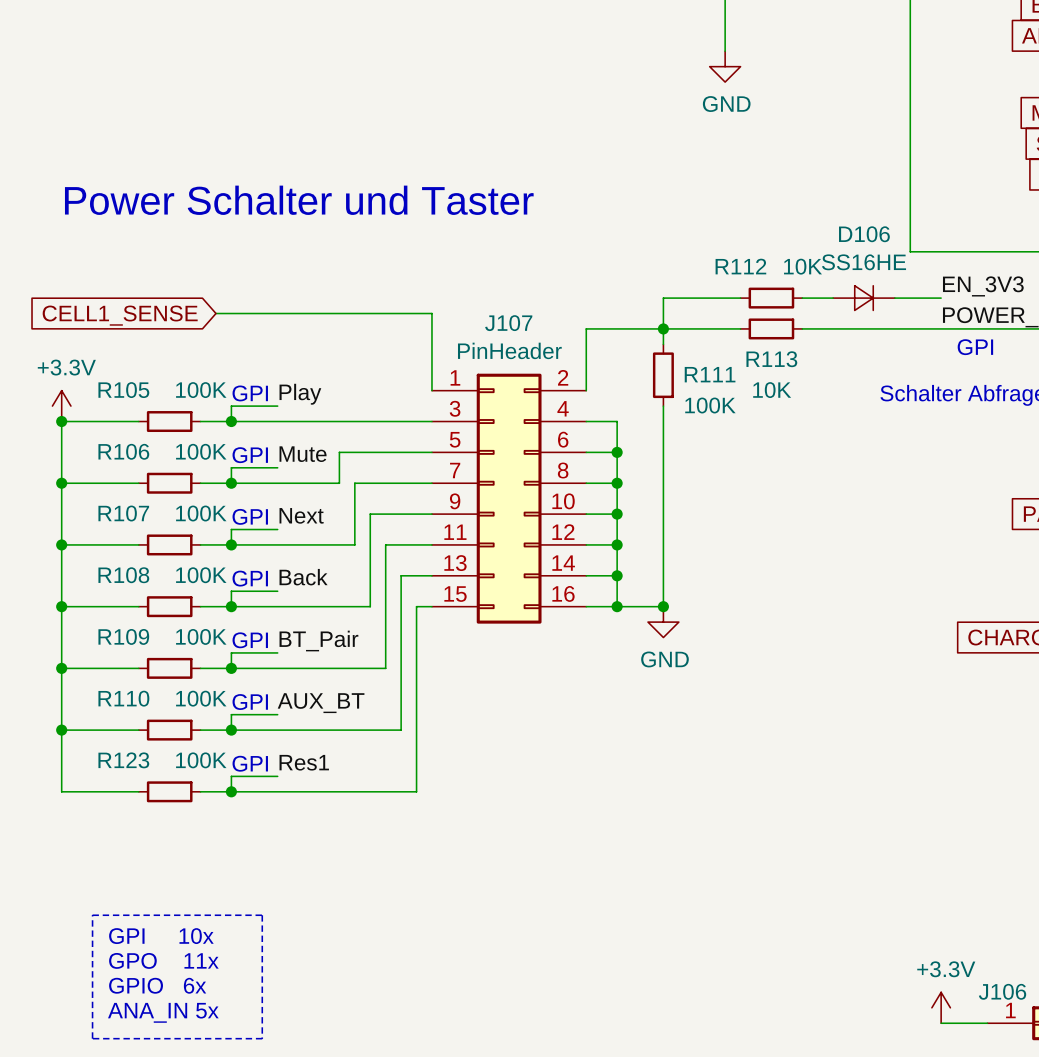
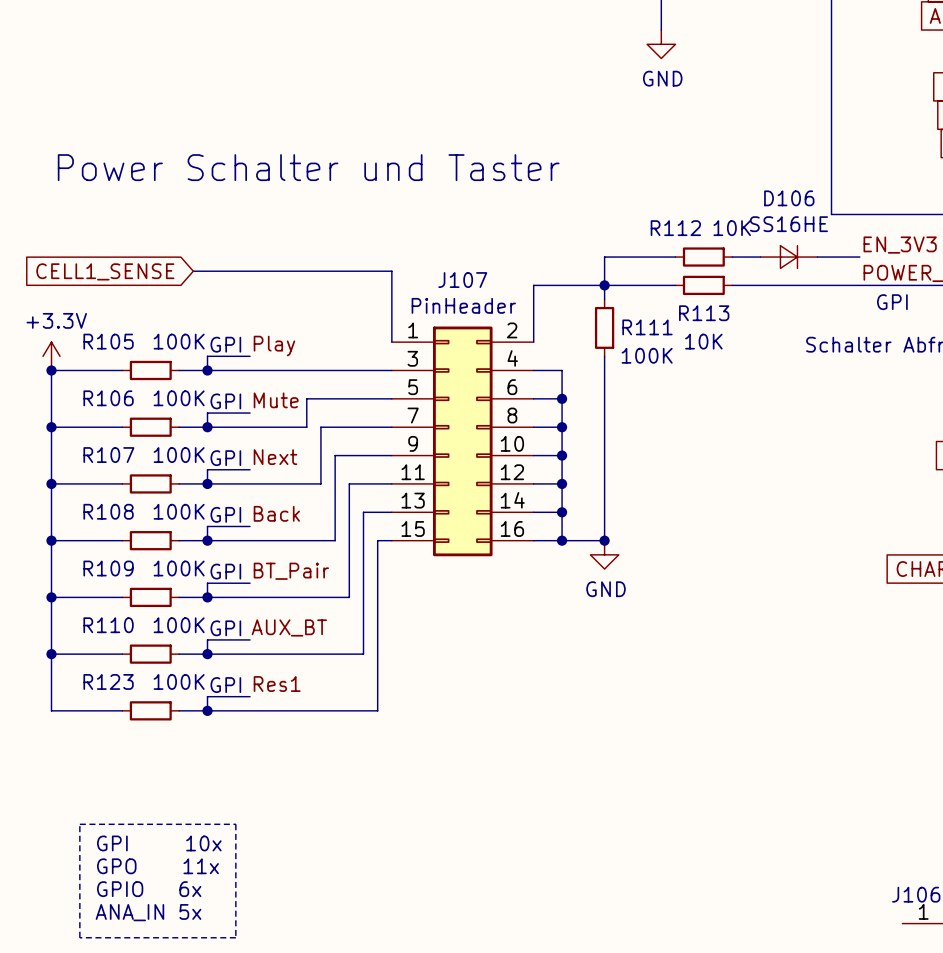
power symbol: +3.3V (941, 1007) -> none
wire: (941, 1023) (987, 1023) -> none

